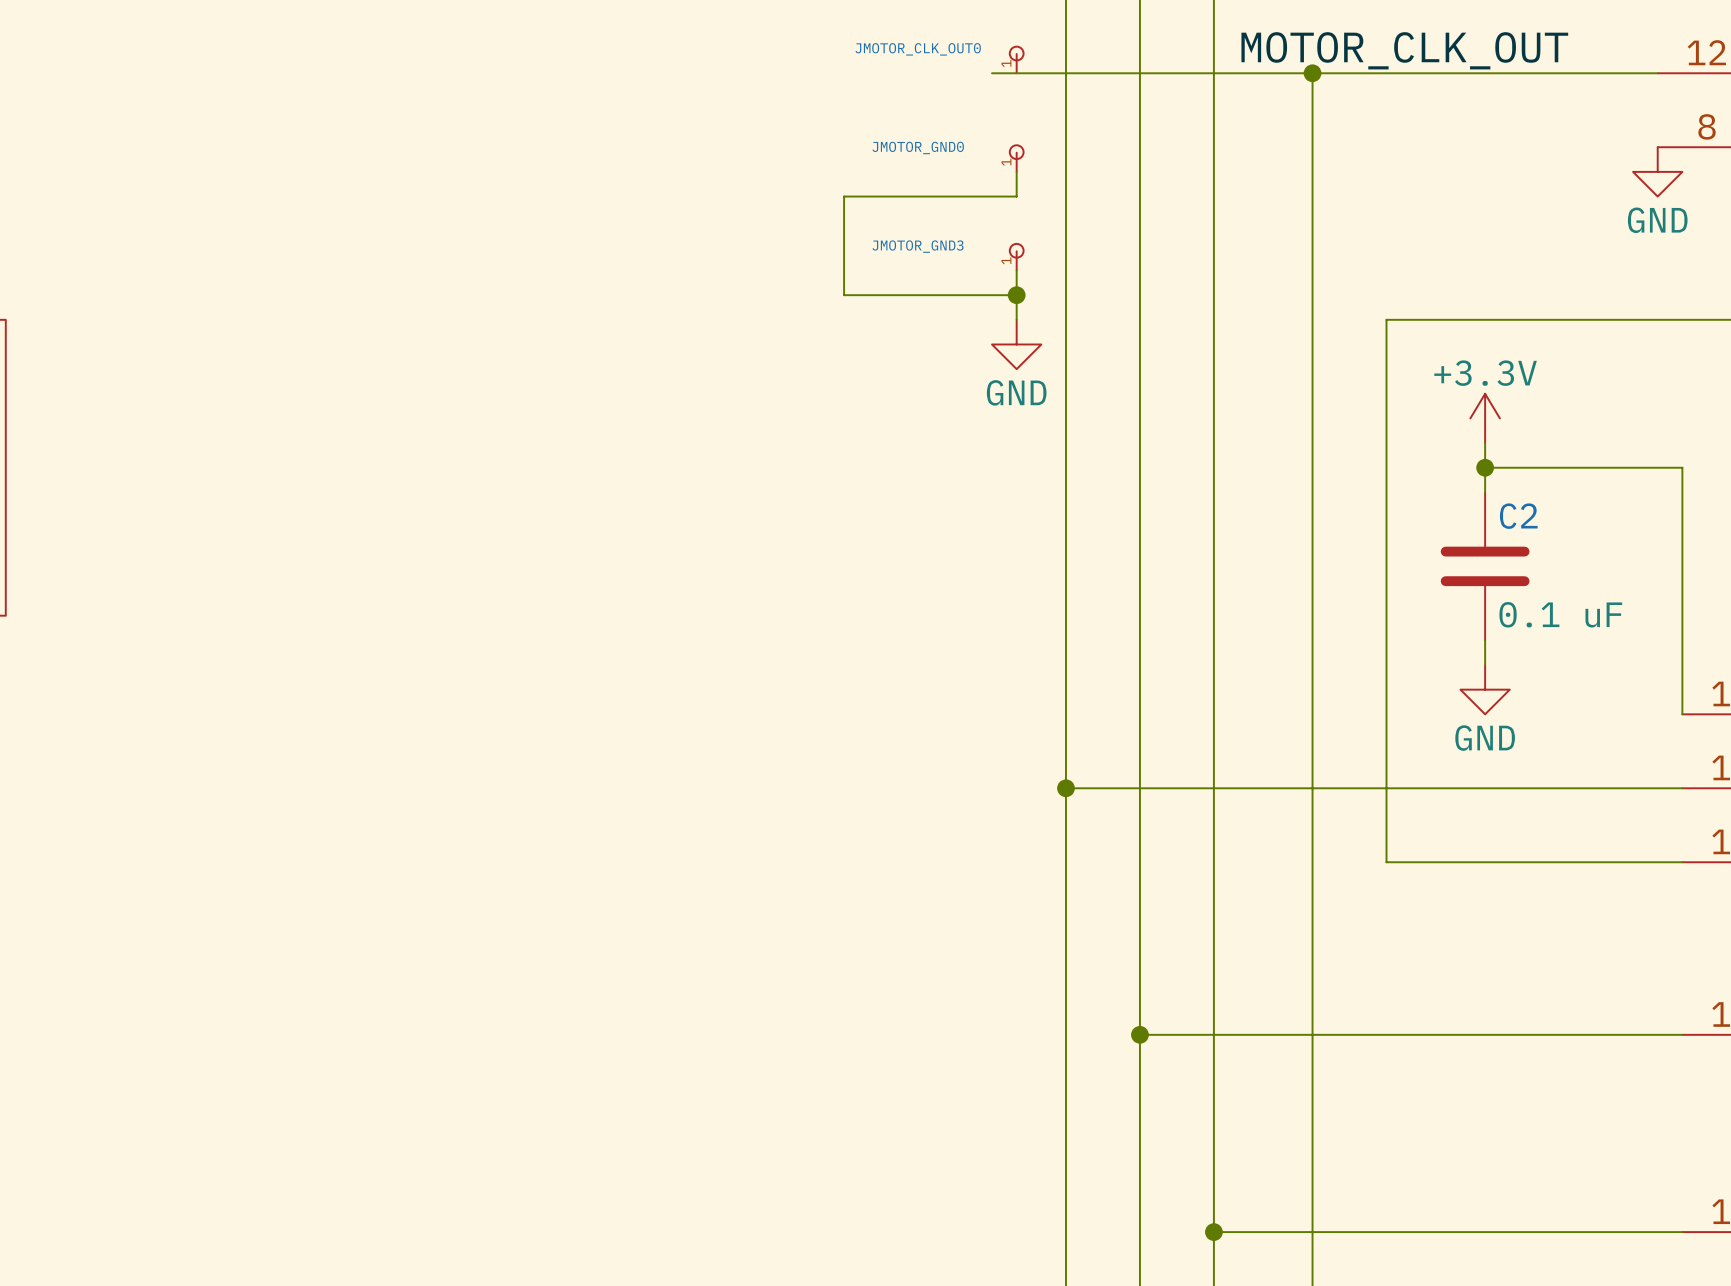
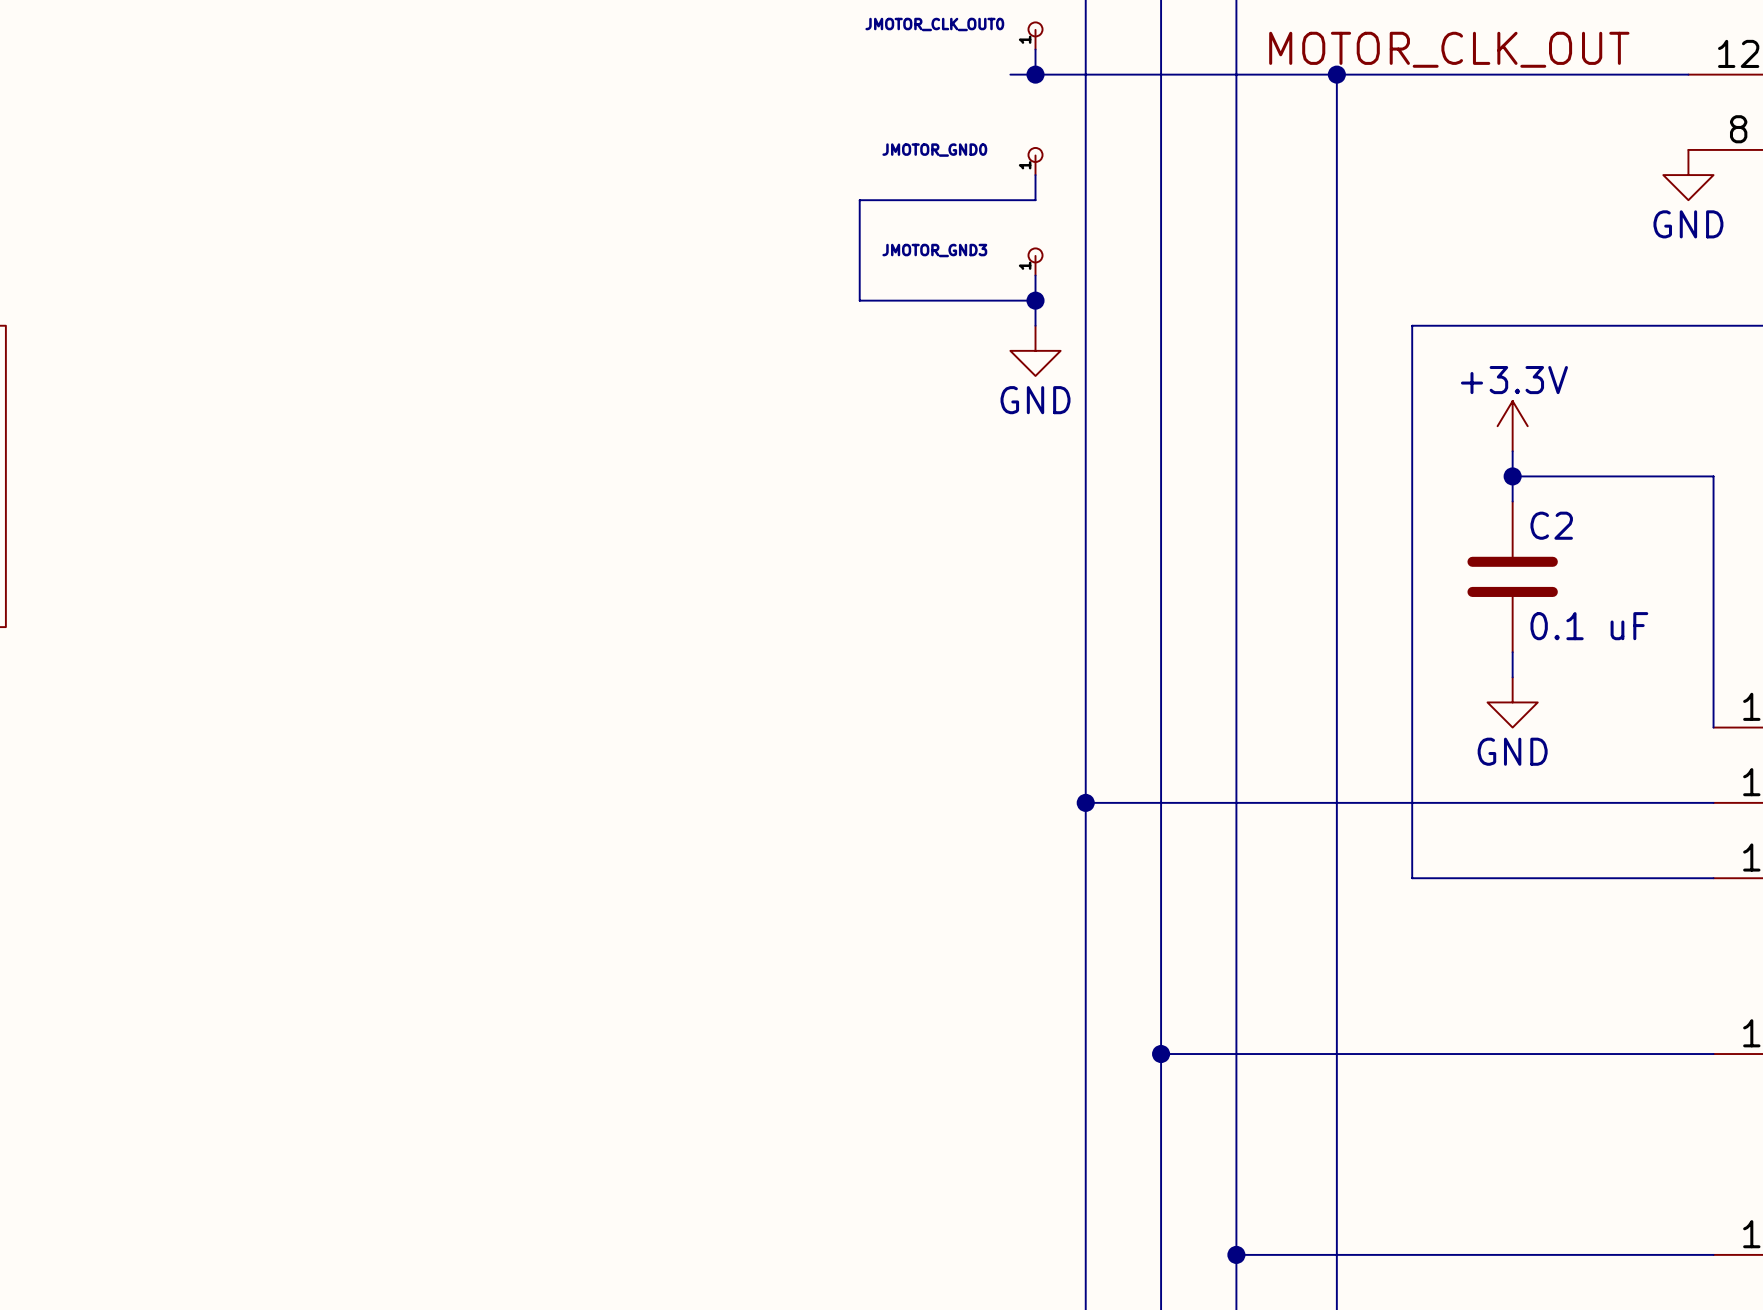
JMOTOR_CLK_OUT0 position: (1016, 59) -> (1035, 35)
junction: none -> (1035, 74)

